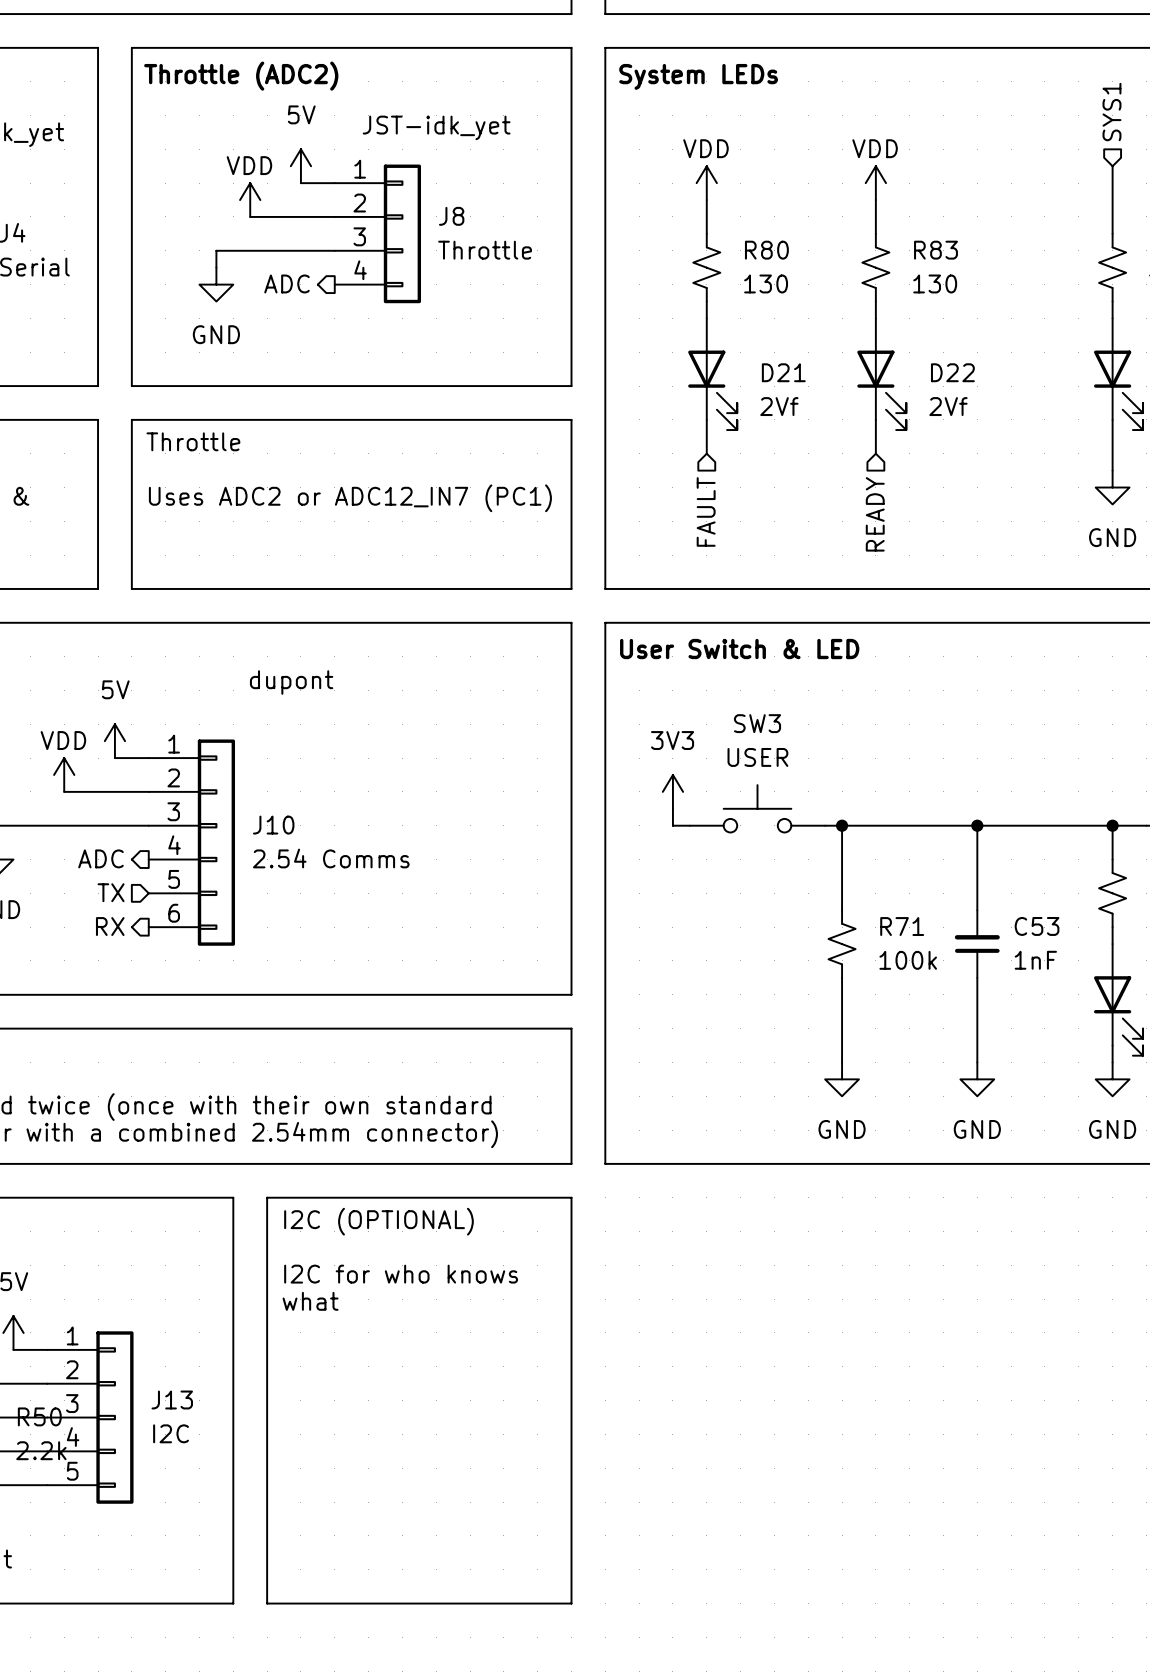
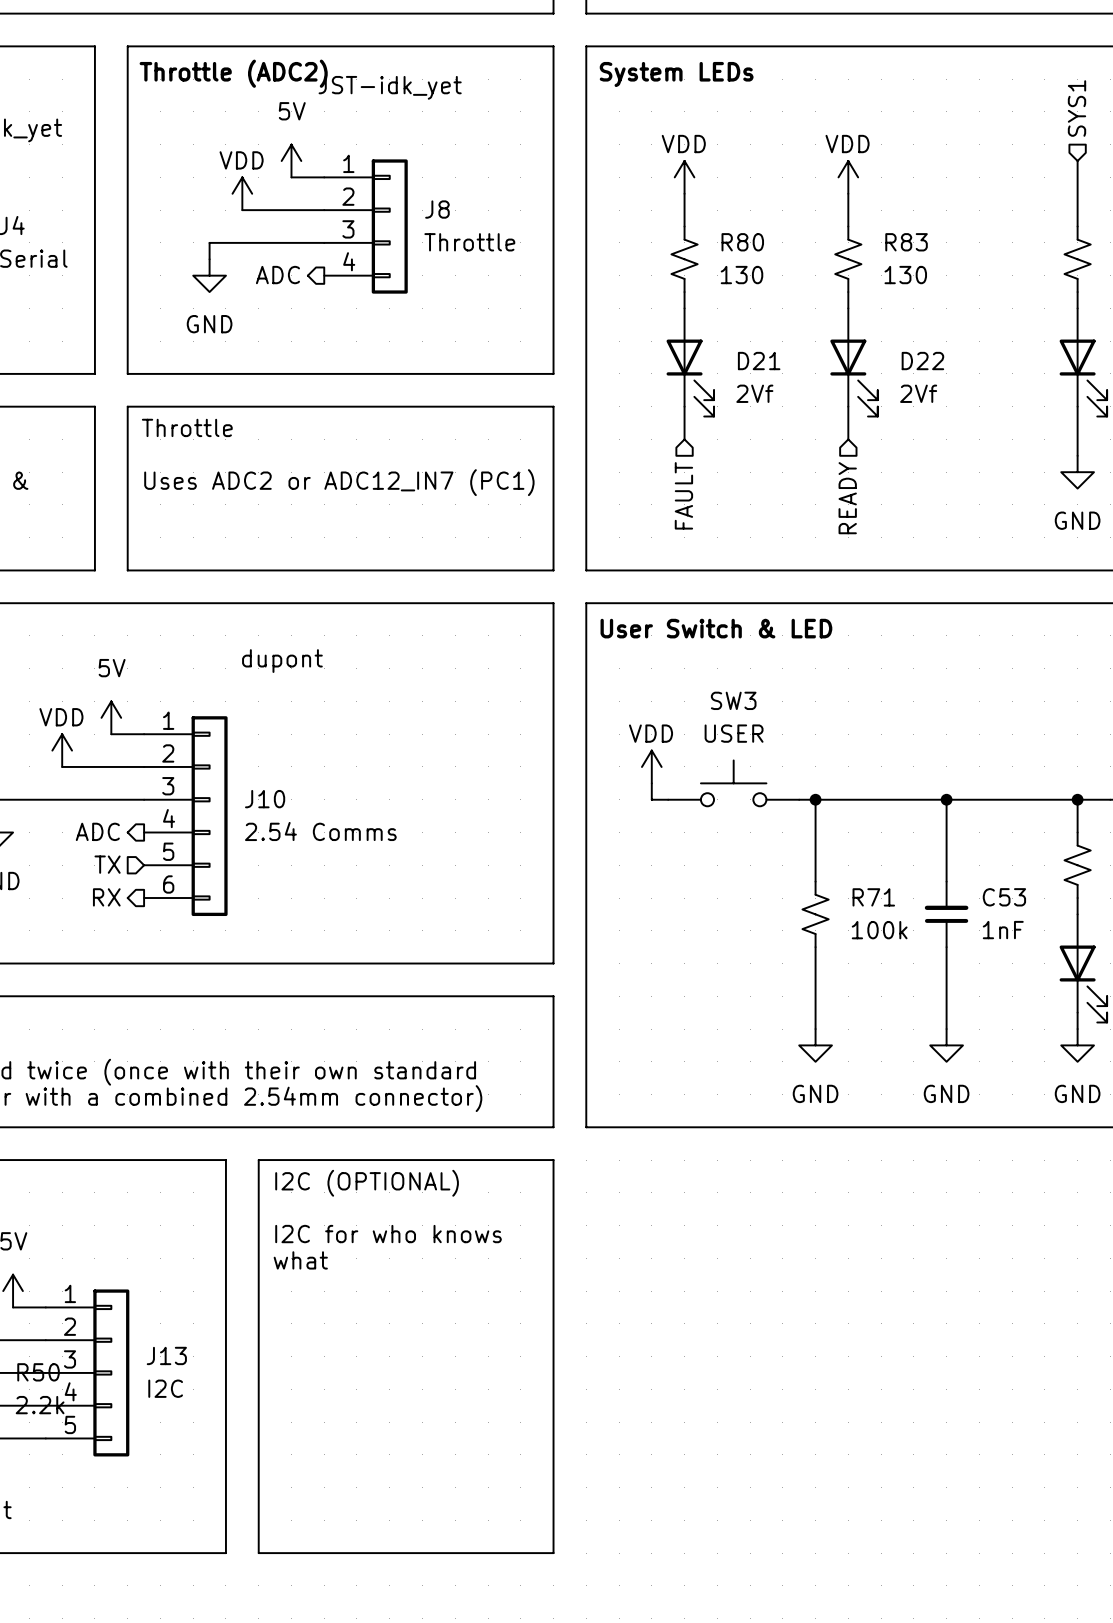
text position: JST-idk_yet (436, 127) -> JST-idk_yet (390, 87)
power symbol: 3V3 (672, 791) -> VDD (651, 766)

